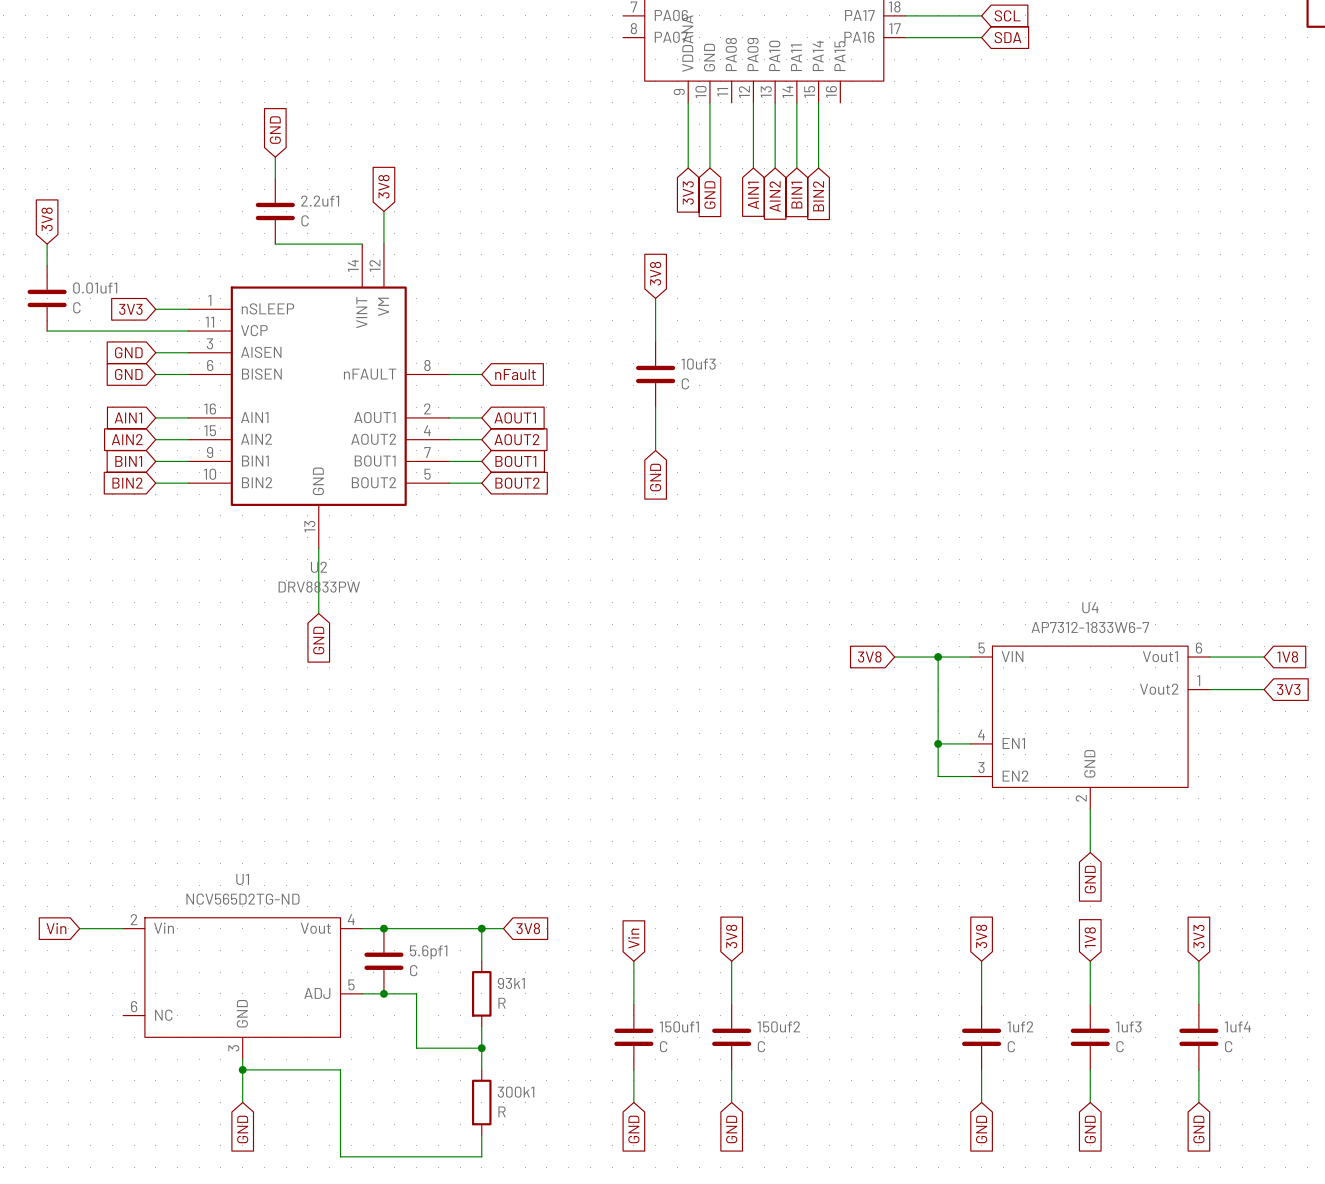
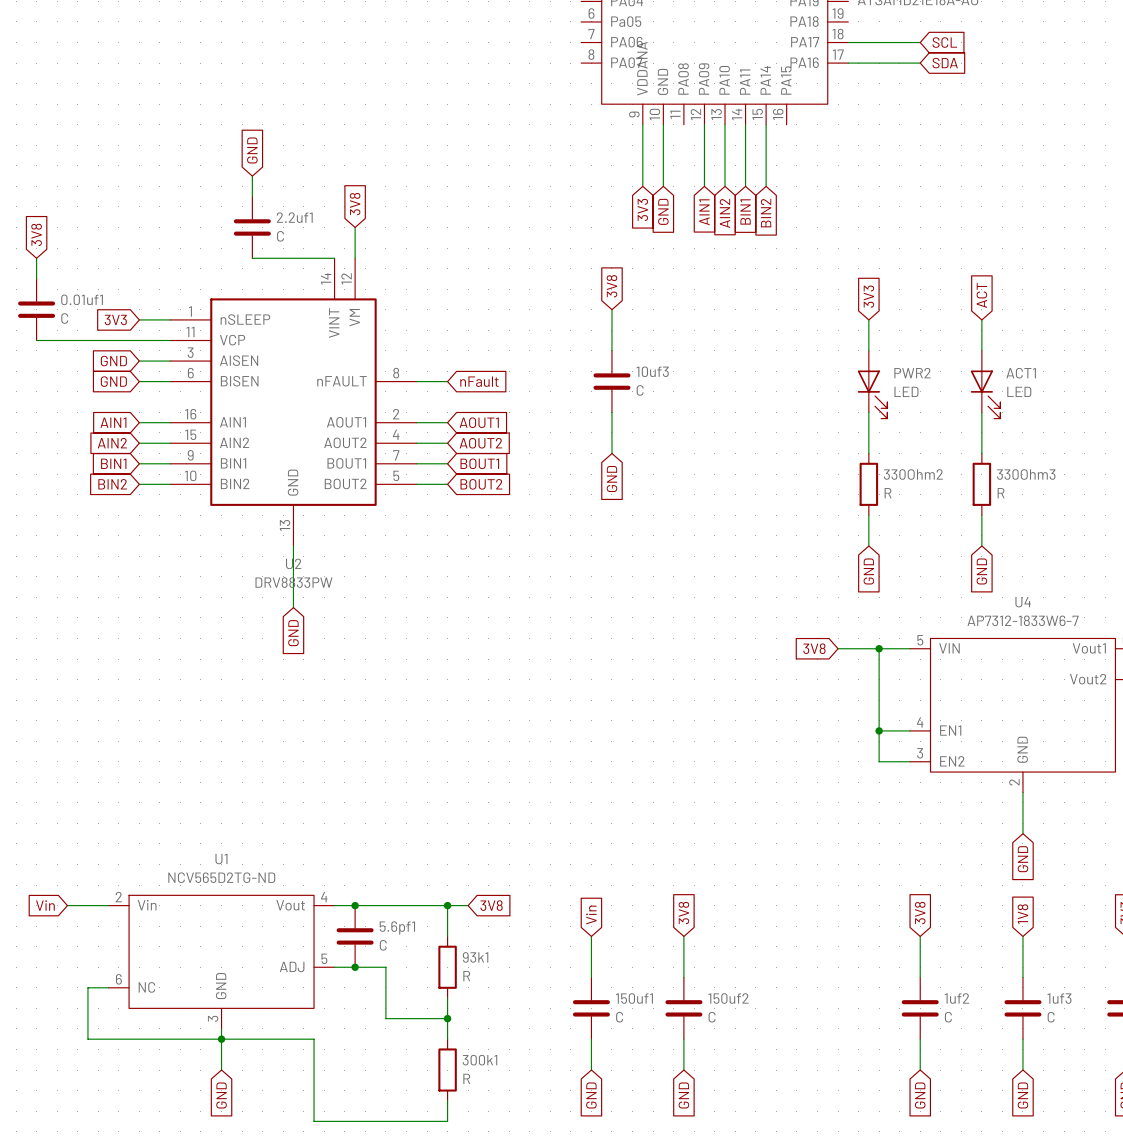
global label: none -> ACT (981, 295)
global label: none -> 3V3 (868, 296)
wire: none -> (868, 319) (868, 350)
wire: none -> (981, 319) (981, 350)
PWR2: none -> LED (872, 384)
ACT1: none -> LED (985, 384)
wire: none -> (868, 412) (868, 453)
wire: none -> (981, 412) (981, 453)
330Ohm2: none -> R (868, 484)
330Ohm3: none -> R (981, 484)
wire: none -> (868, 515) (868, 545)
wire: none -> (981, 515) (981, 545)
global label: none -> GND (868, 571)
global label: none -> GND (981, 571)
wire: none -> (108, 987) (87, 987) (87, 1039) (221, 1039)

